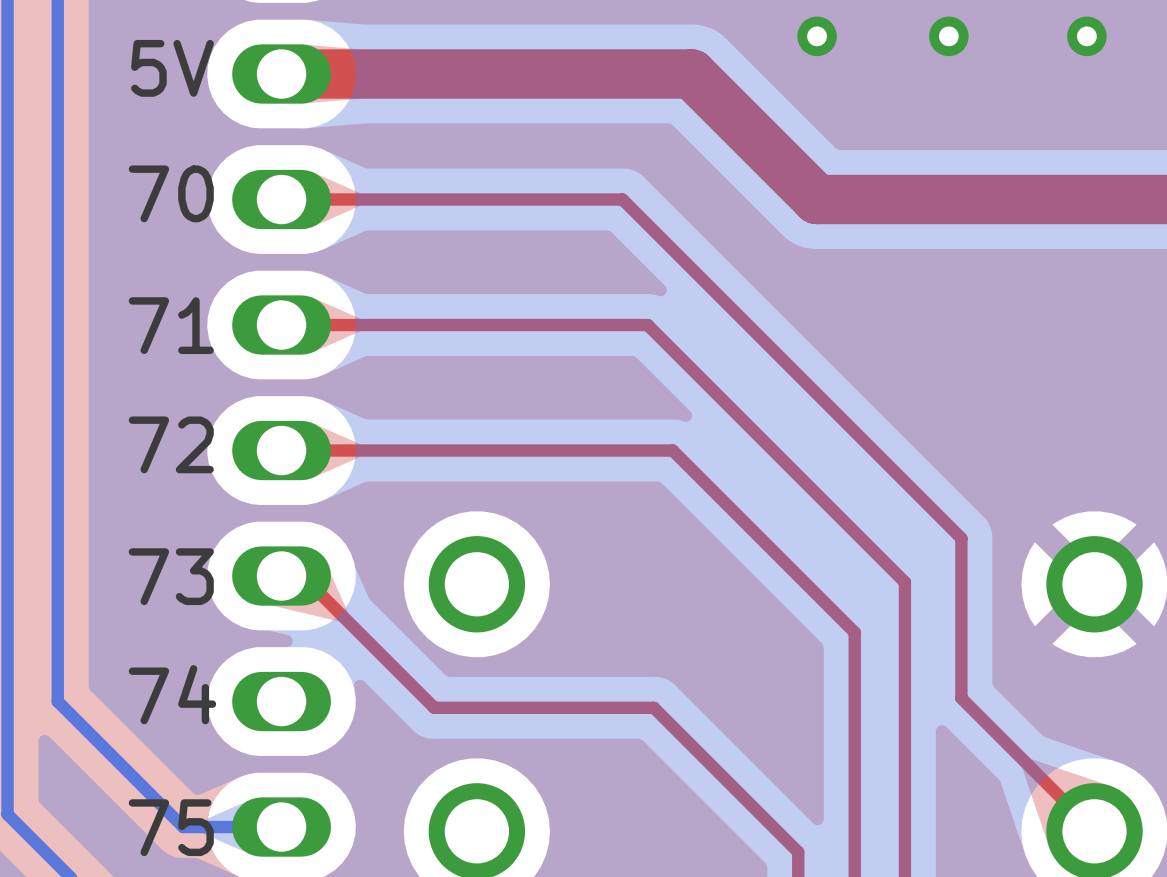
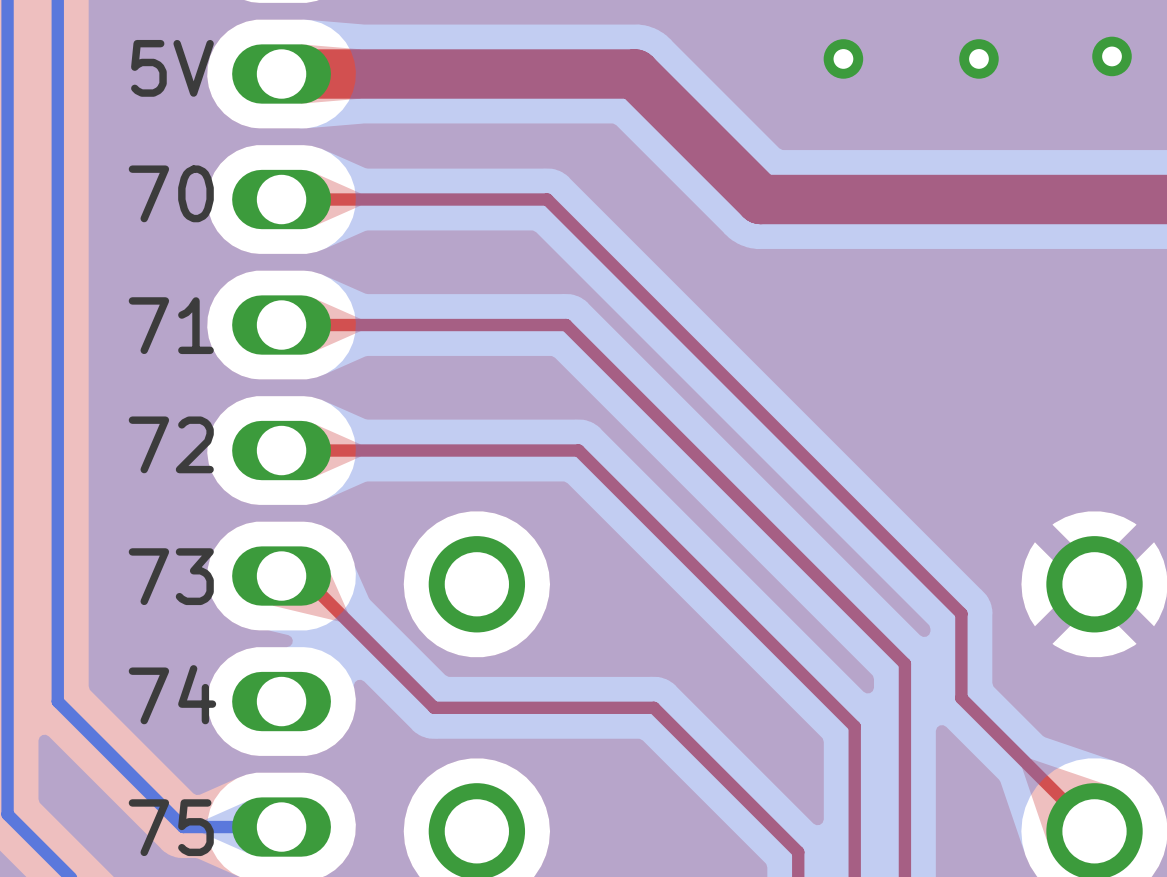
via position: (817, 36) -> (843, 58)
via position: (948, 36) -> (978, 58)
via position: (1086, 36) -> (1112, 56)
top track: (635, 74) (691, 74) (817, 199) -> (635, 74) (760, 199) (817, 199)
top track: (547, 199) (622, 199) (961, 538) (961, 613) -> (547, 199) (961, 613)
top track: (566, 325) (647, 325) (904, 582) (904, 663) -> (566, 325) (904, 663)
top track: (578, 450) (672, 450) (854, 632) (854, 726) -> (578, 450) (854, 726)

